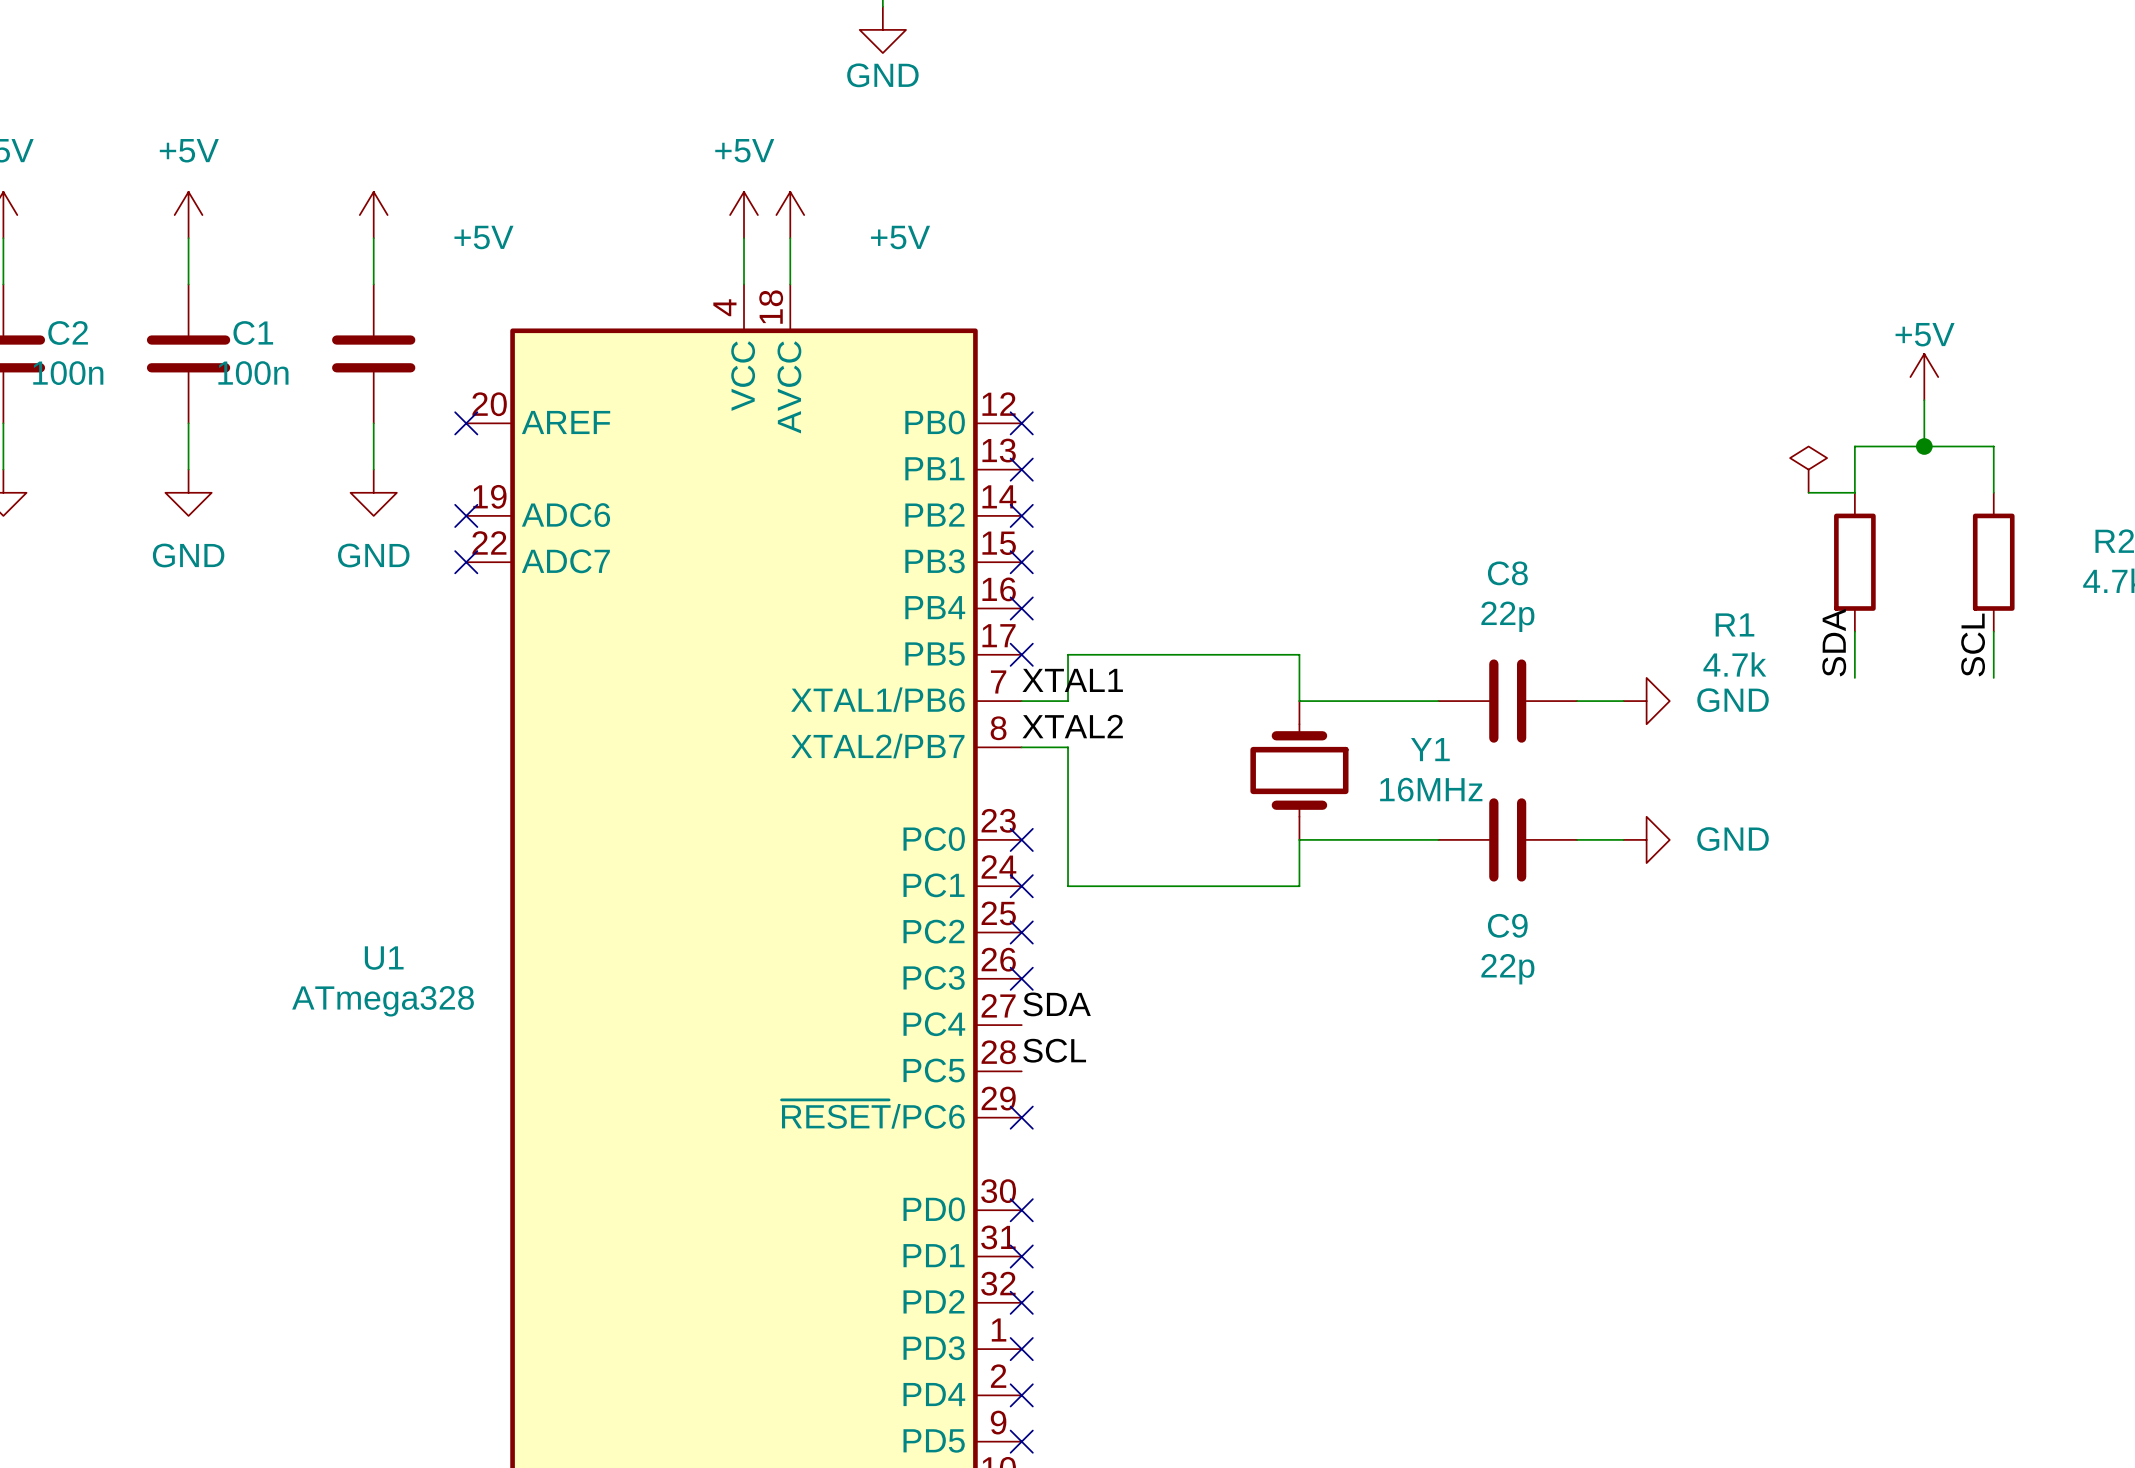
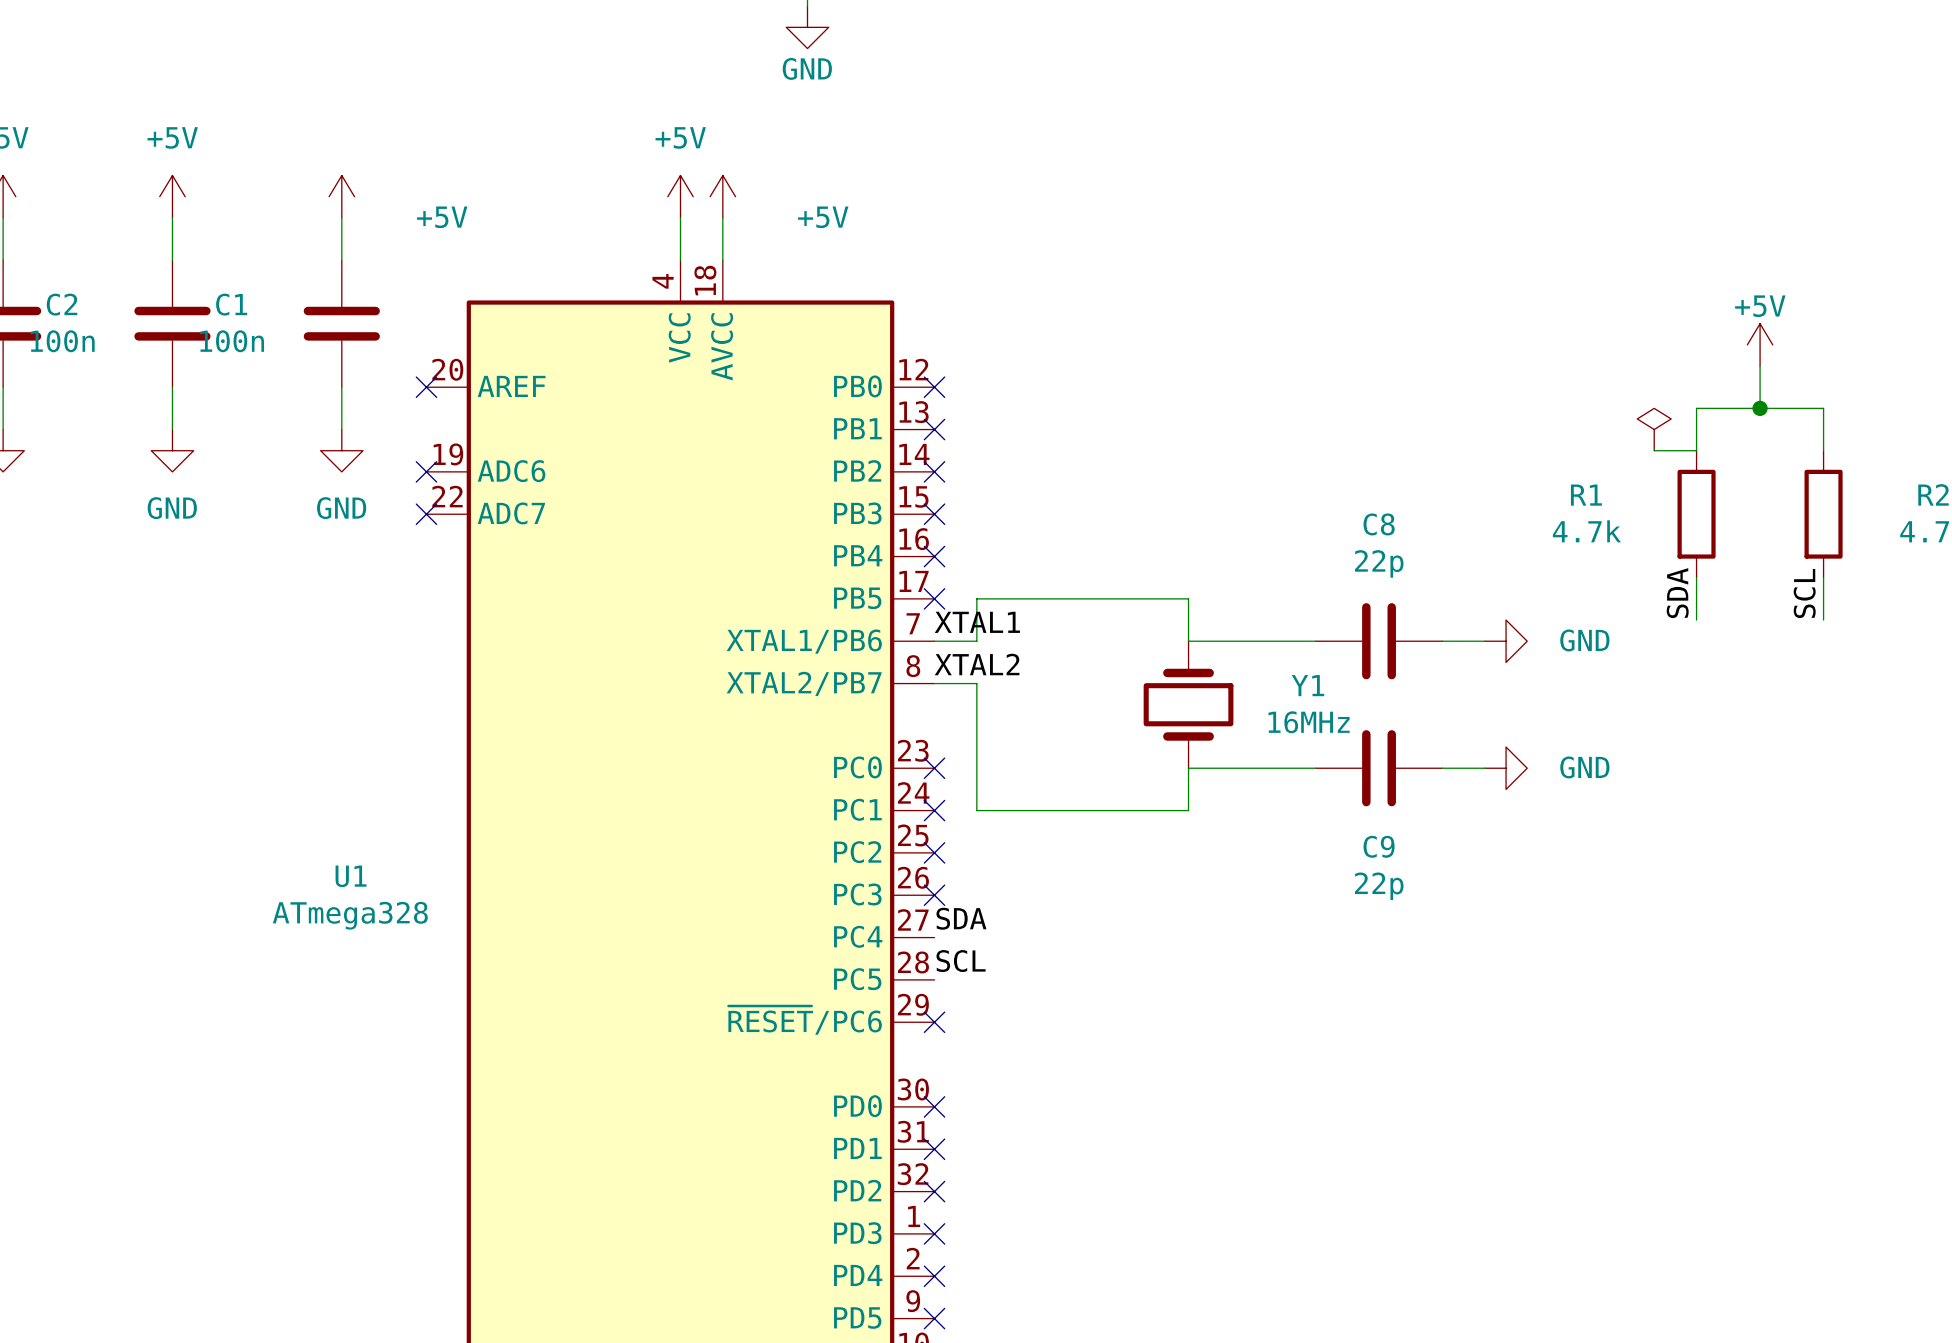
R1 name position: R1 (1734, 624) -> R1 (1586, 495)
R1 value position: 4.7k (1734, 664) -> 4.7k (1586, 531)

